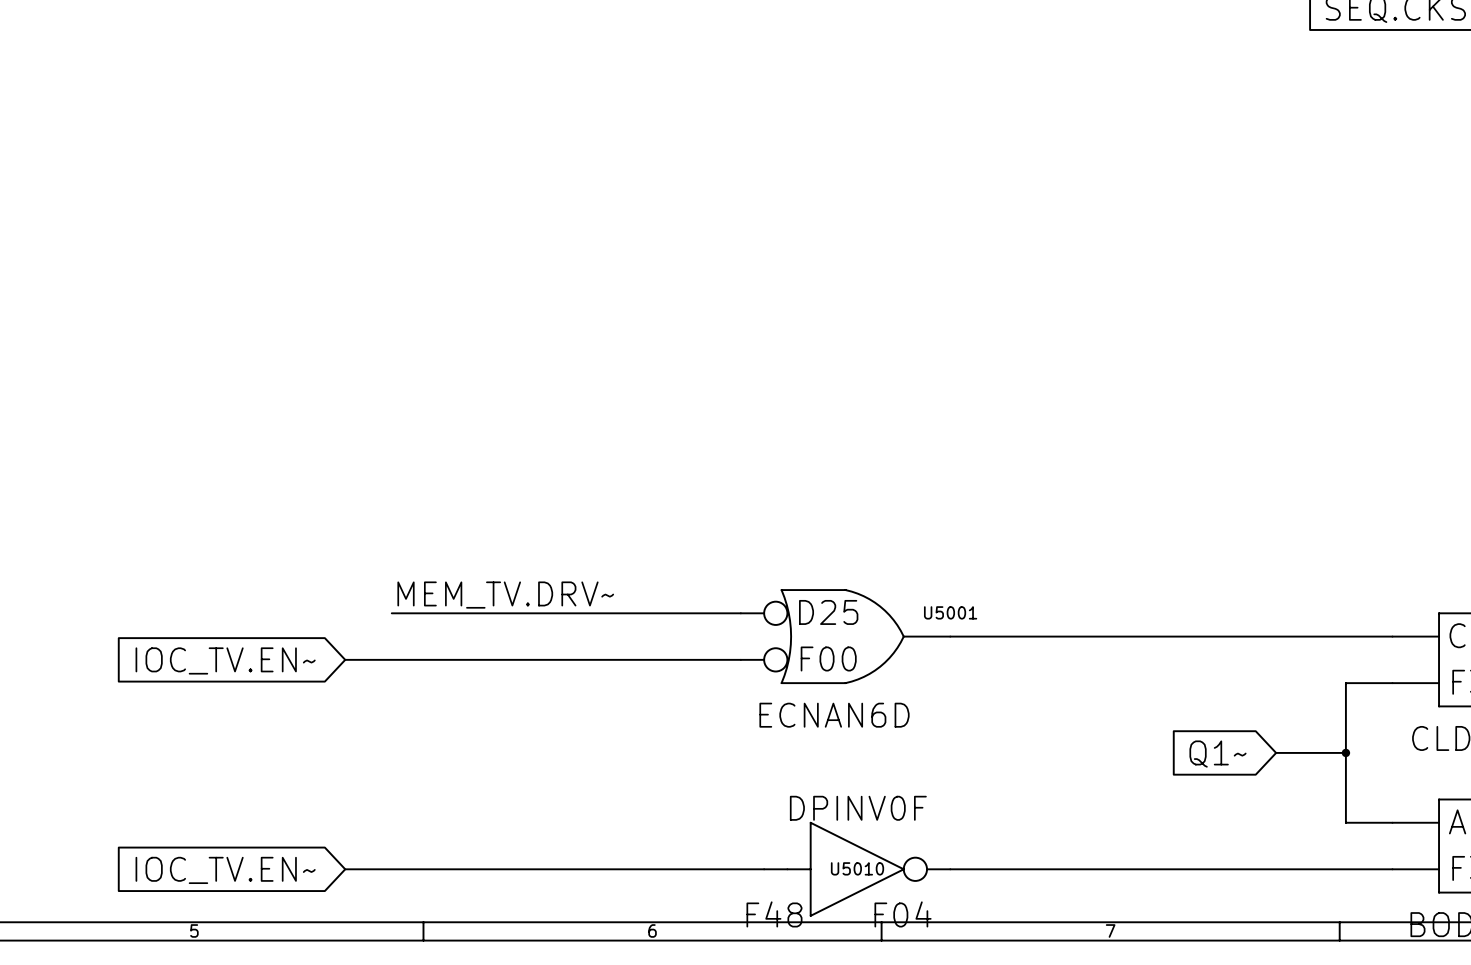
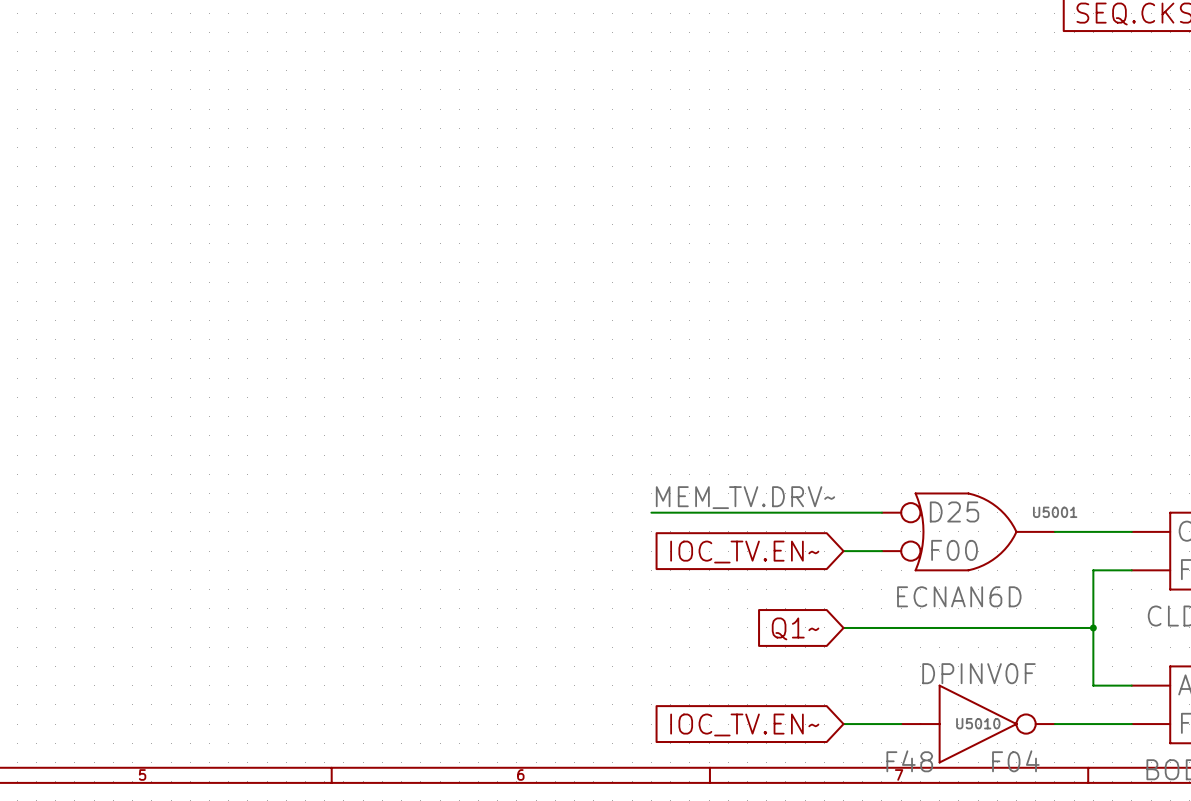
label: MEM_TV.DRV~ (505, 595) -> none
label: none -> MEM_TV.DRV~ (745, 497)
wire: (391, 613) (740, 613) -> none
wire: none -> (651, 512) (881, 512)
U5001 position: (845, 636) -> (968, 531)
wire: (950, 636) (1299, 636) -> none
wire: (345, 659) (740, 659) -> none
wire: none -> (843, 551) (881, 551)
global label: IOC_TV.EN~ (225, 660) -> none
global label: none -> IOC_TV.EN~ (744, 552)
wire: none -> (843, 627) (1035, 627)
global label: none -> Q1~ (795, 628)
global label: Q1~ (1217, 754) -> none
wire: (345, 869) (764, 869) -> none
U5010 position: (857, 869) -> (978, 724)
wire: (950, 869) (1043, 869) -> none
wire: (1113, 869) (1299, 869) -> none
global label: IOC_TV.EN~ (225, 870) -> none
global label: none -> IOC_TV.EN~ (744, 724)

